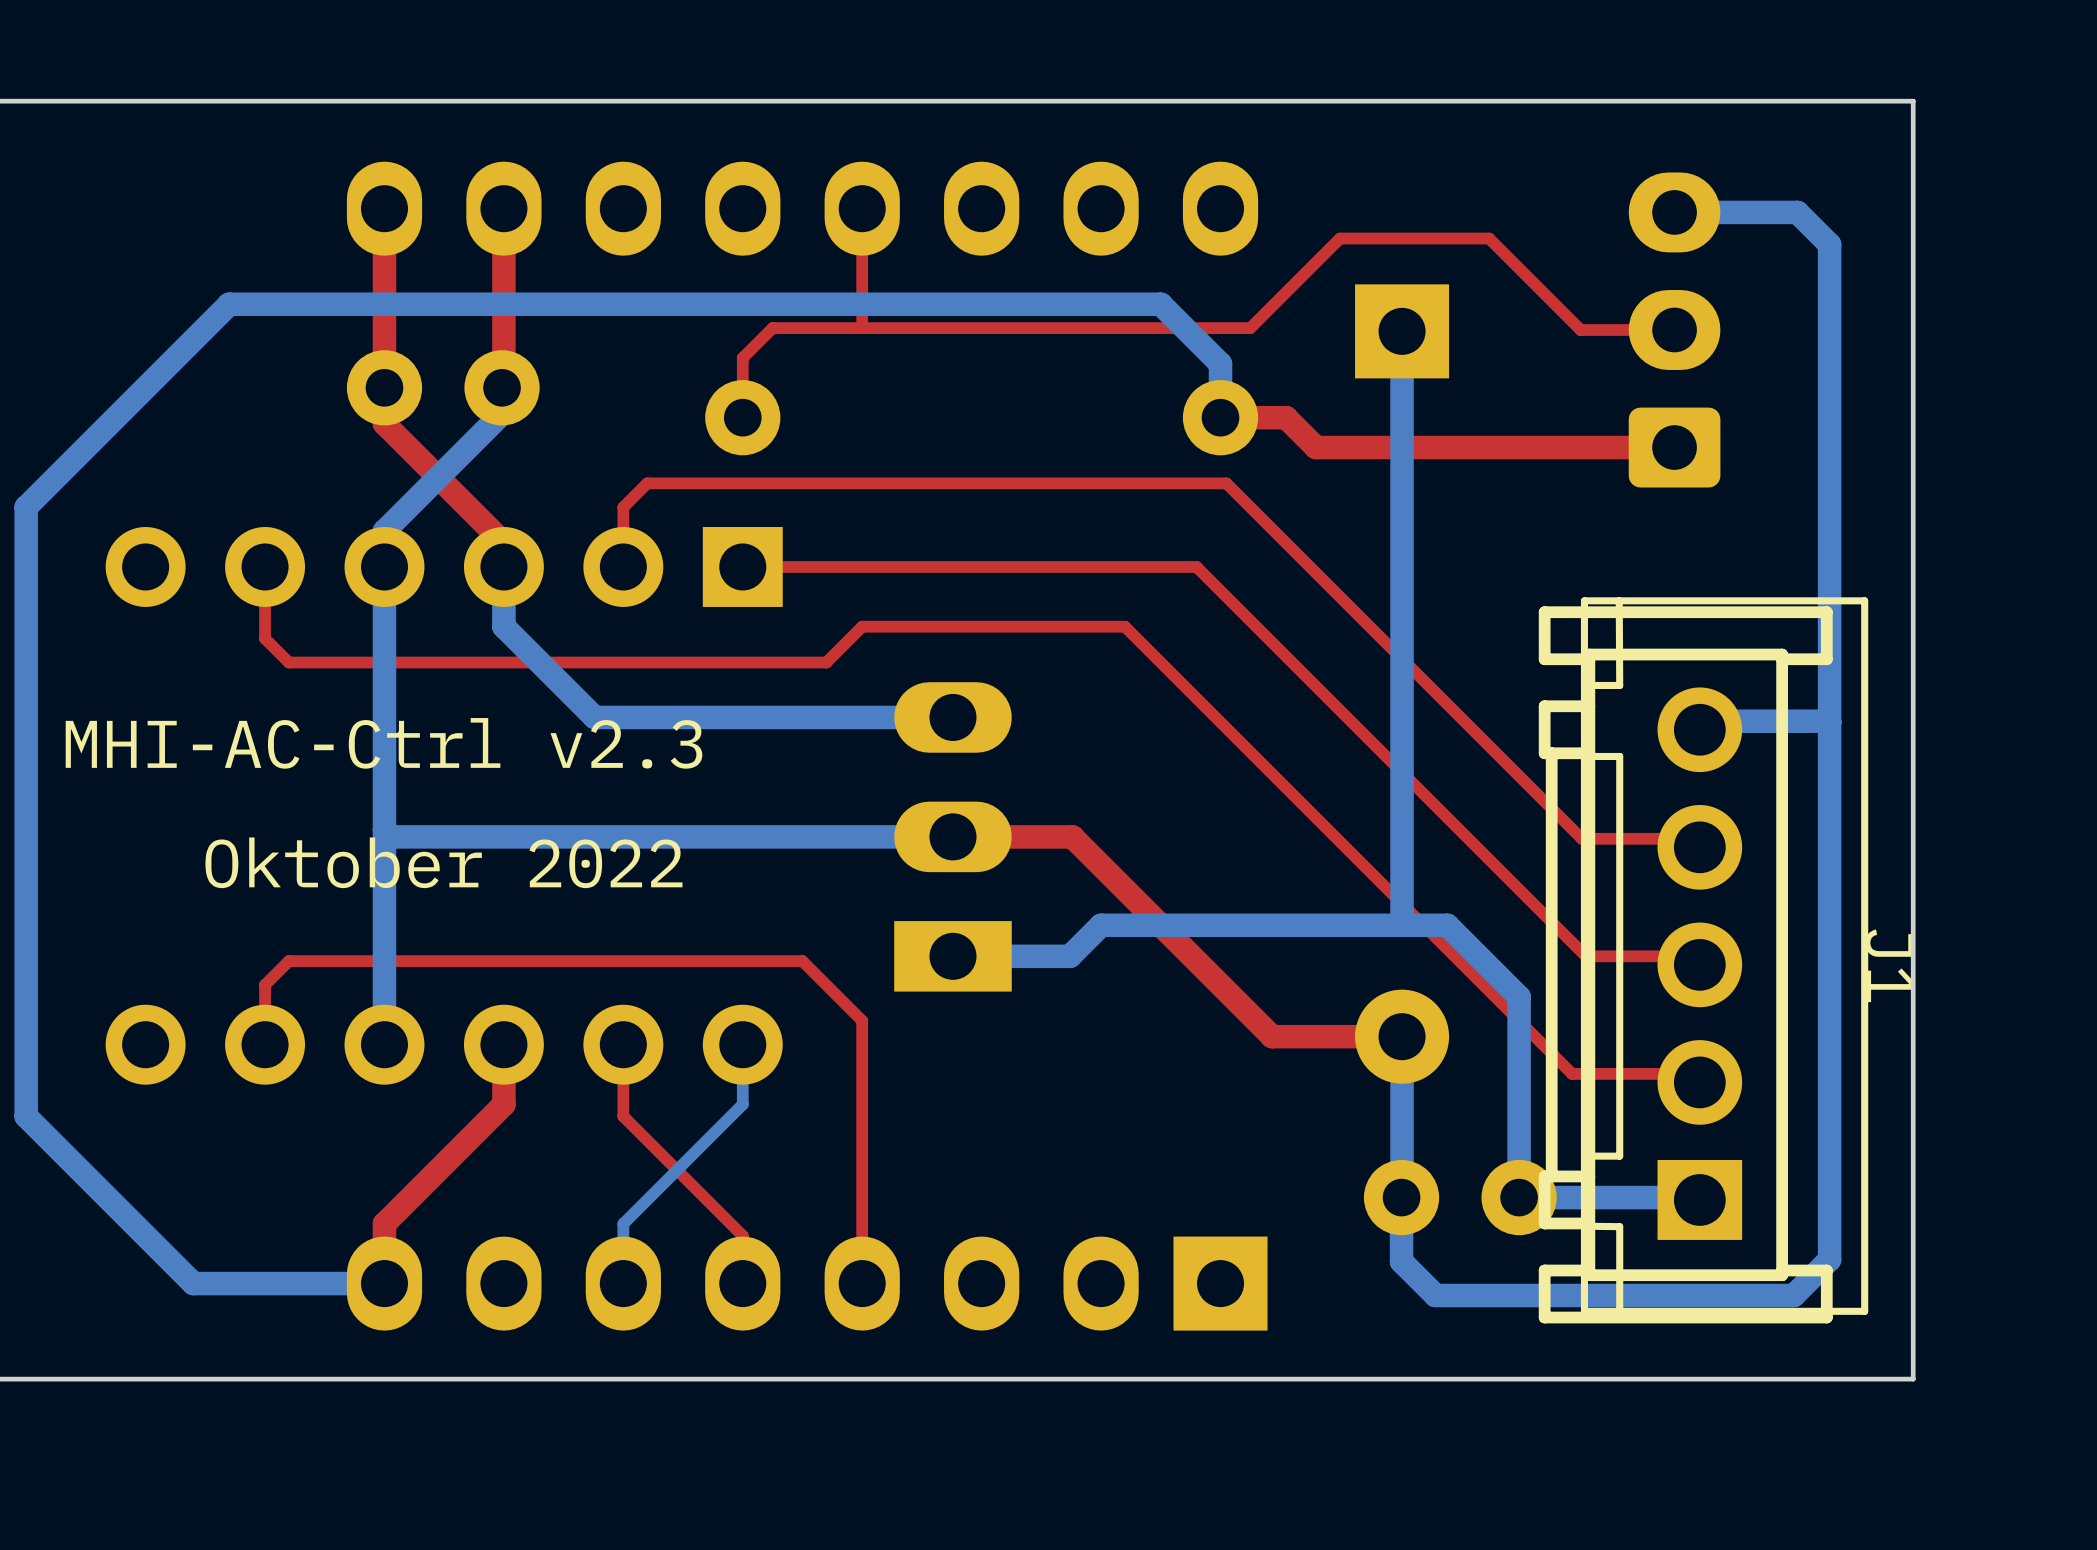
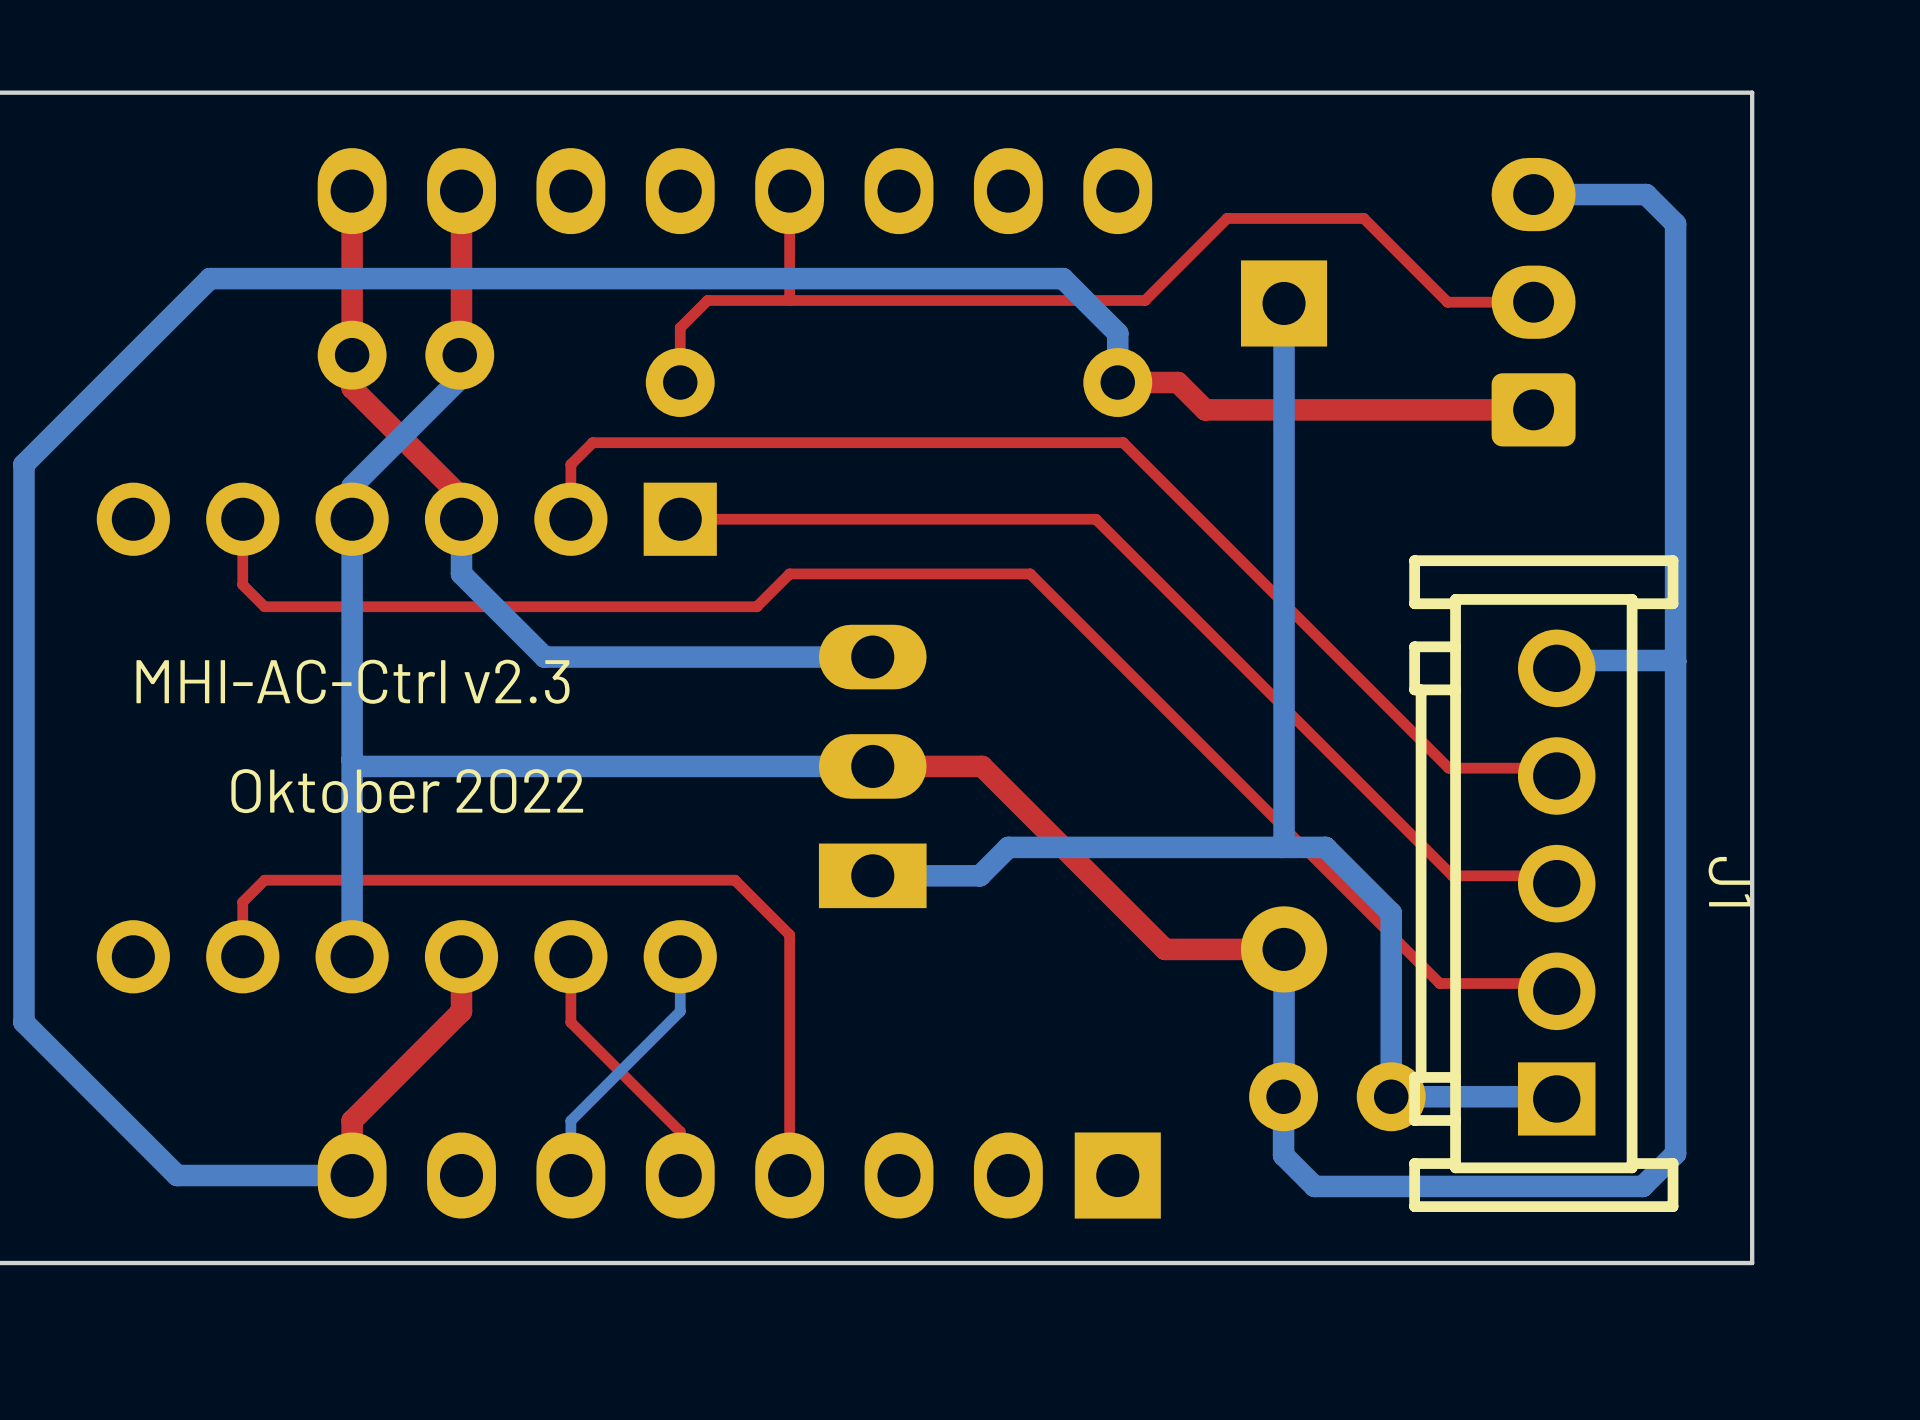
line: (1619, 600) (1619, 685) (1584, 685) -> none
line: (1864, 600) (1584, 600) (1584, 1311) (1864, 1311) (1864, 600) -> none
line: (1584, 756) (1619, 756) (1619, 1156) (1584, 1156) -> none
line: (1584, 1226) (1619, 1226) (1619, 1311) -> none

